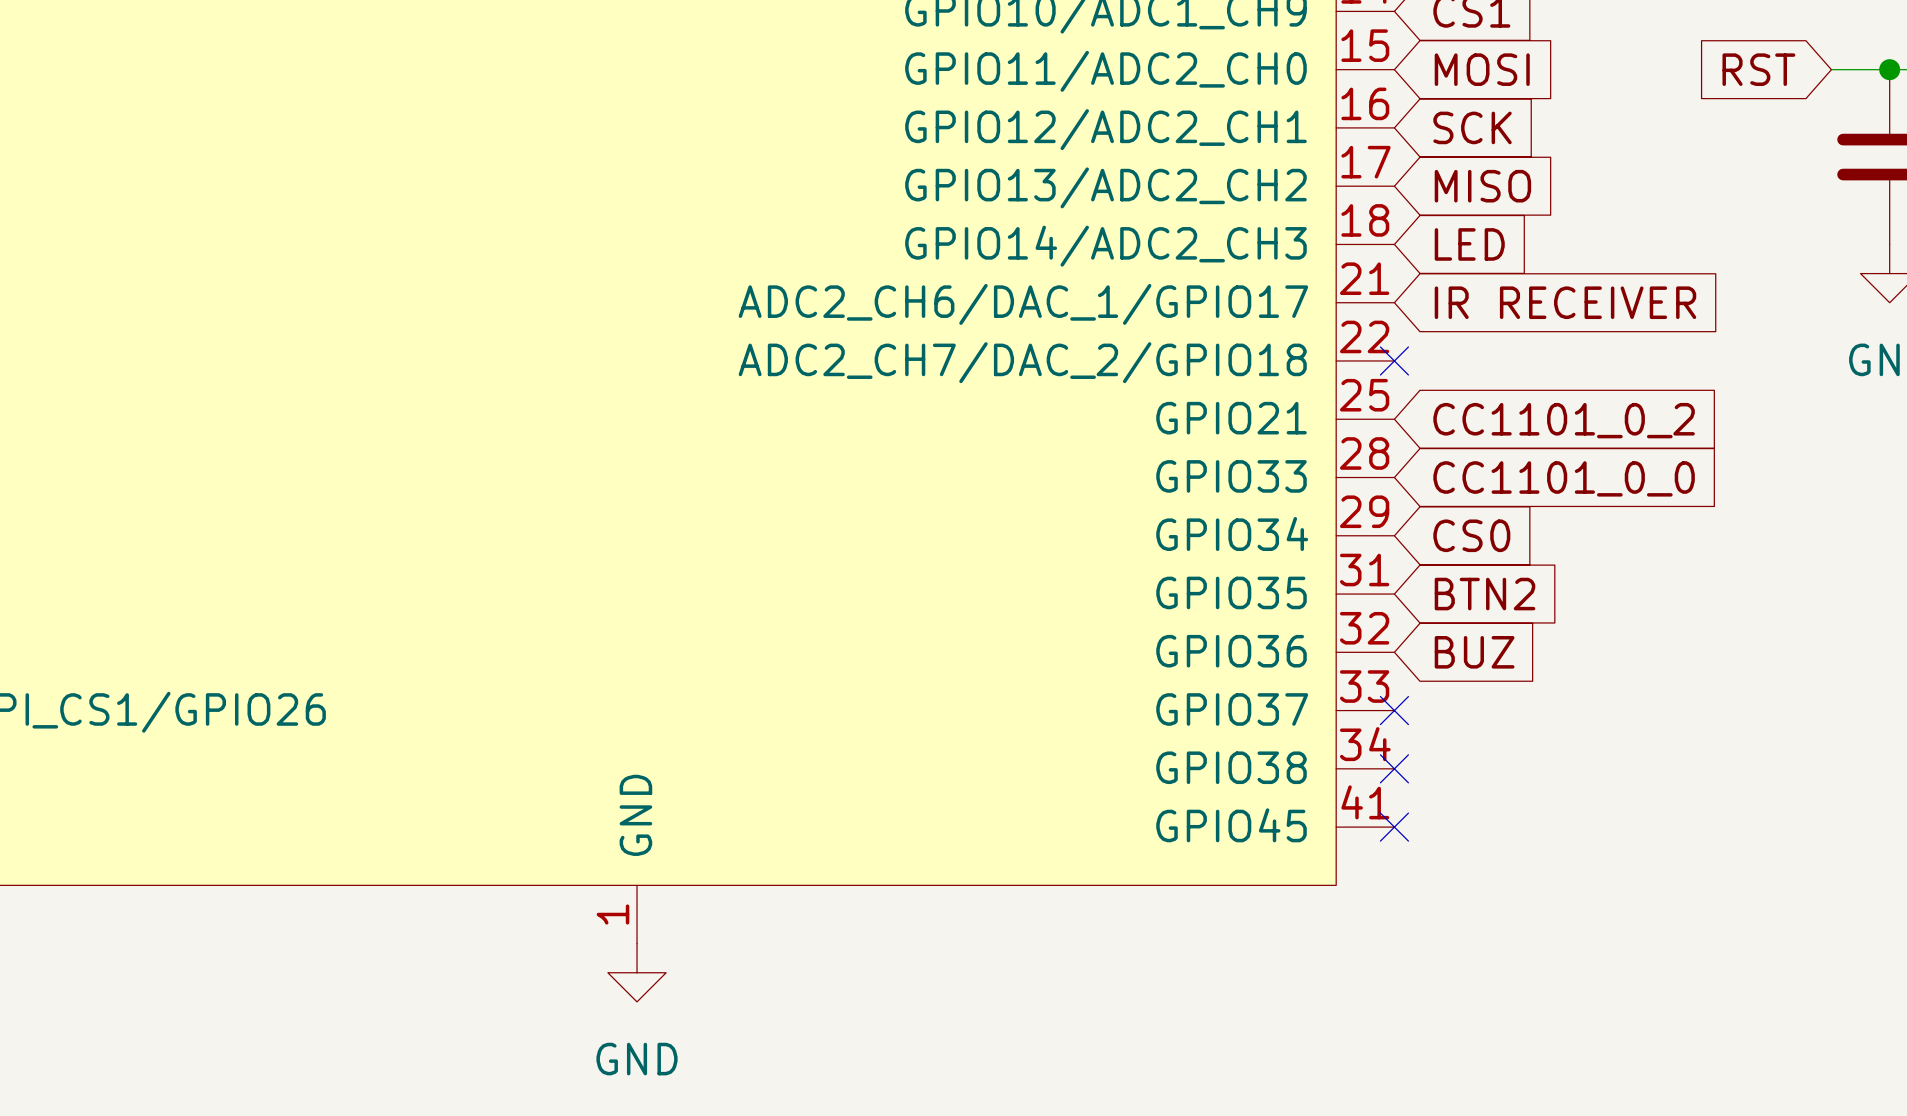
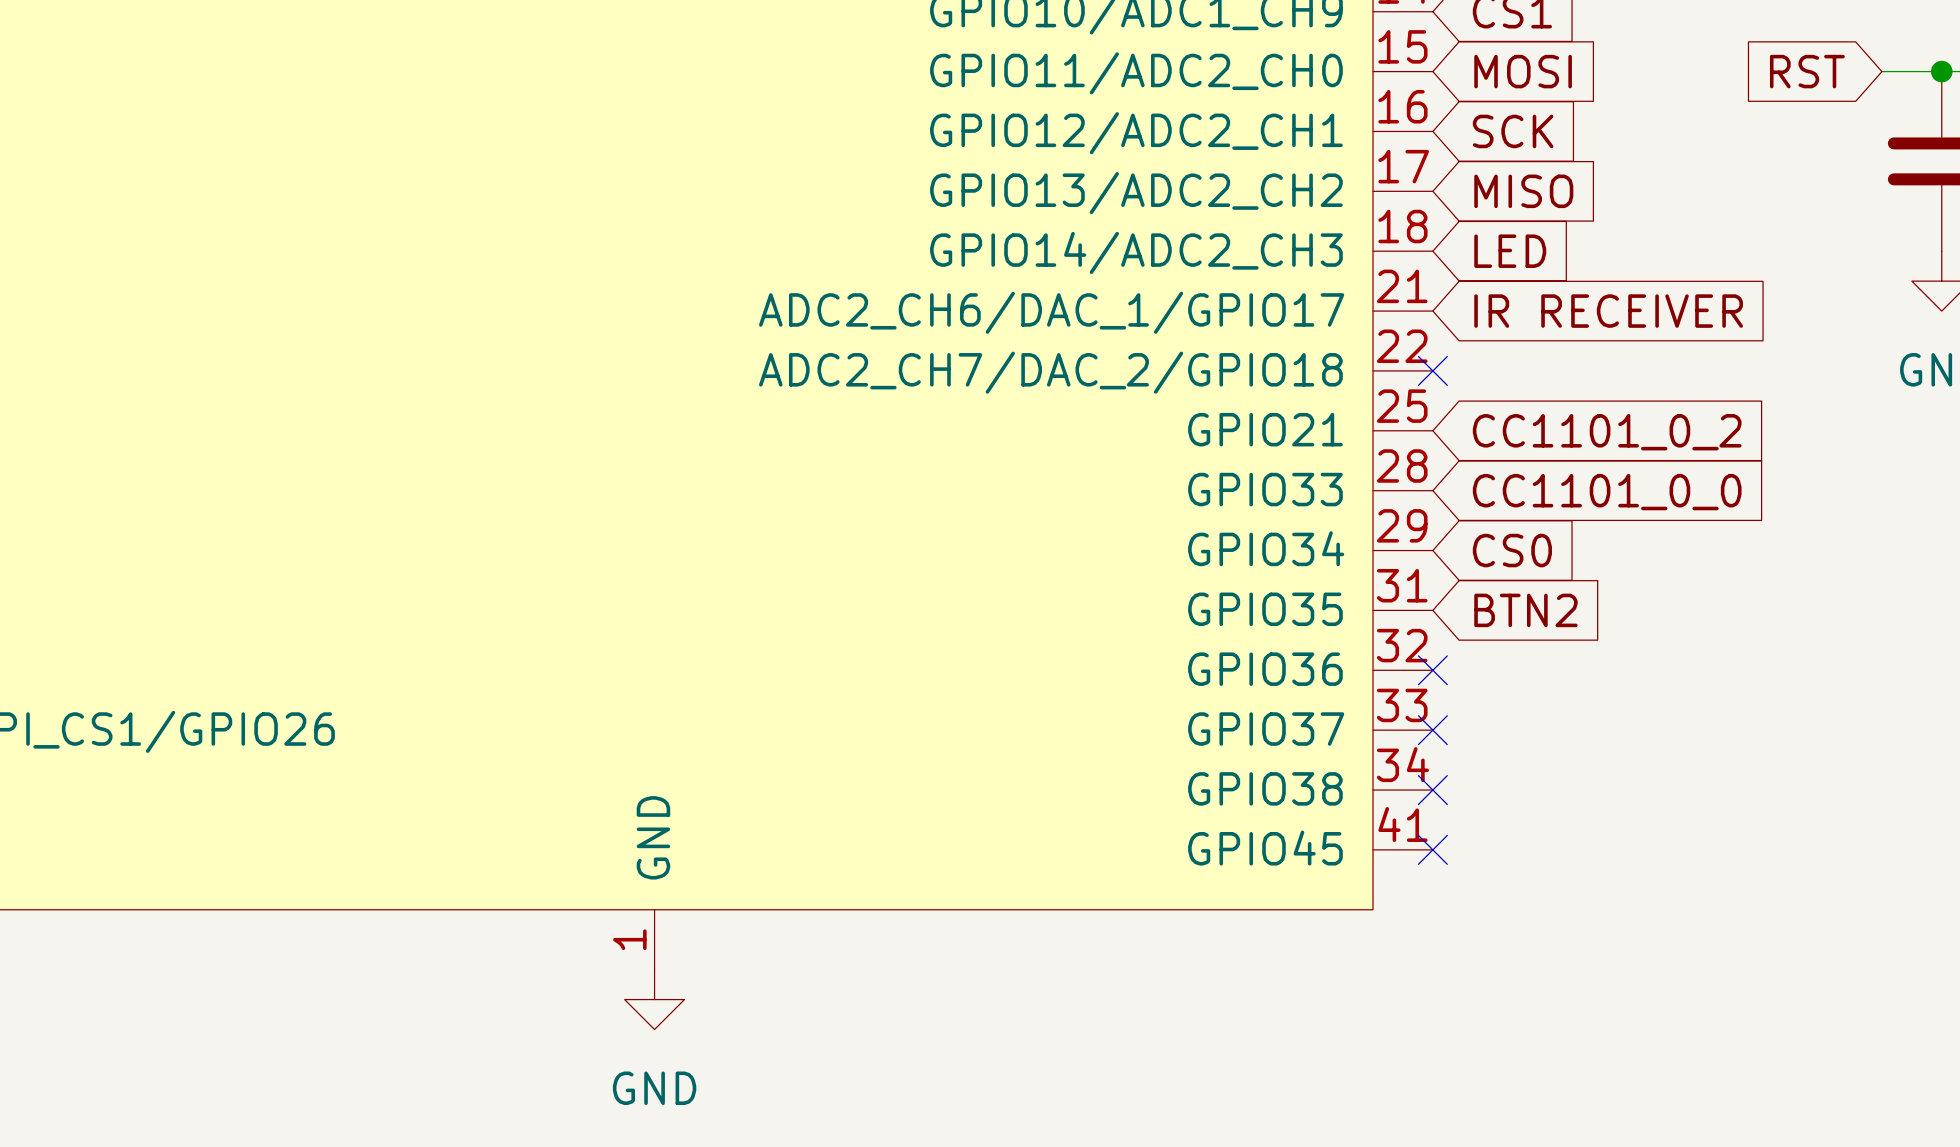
no-connect mark: none -> (1432, 670)
global label: BUZ (1474, 652) -> none

